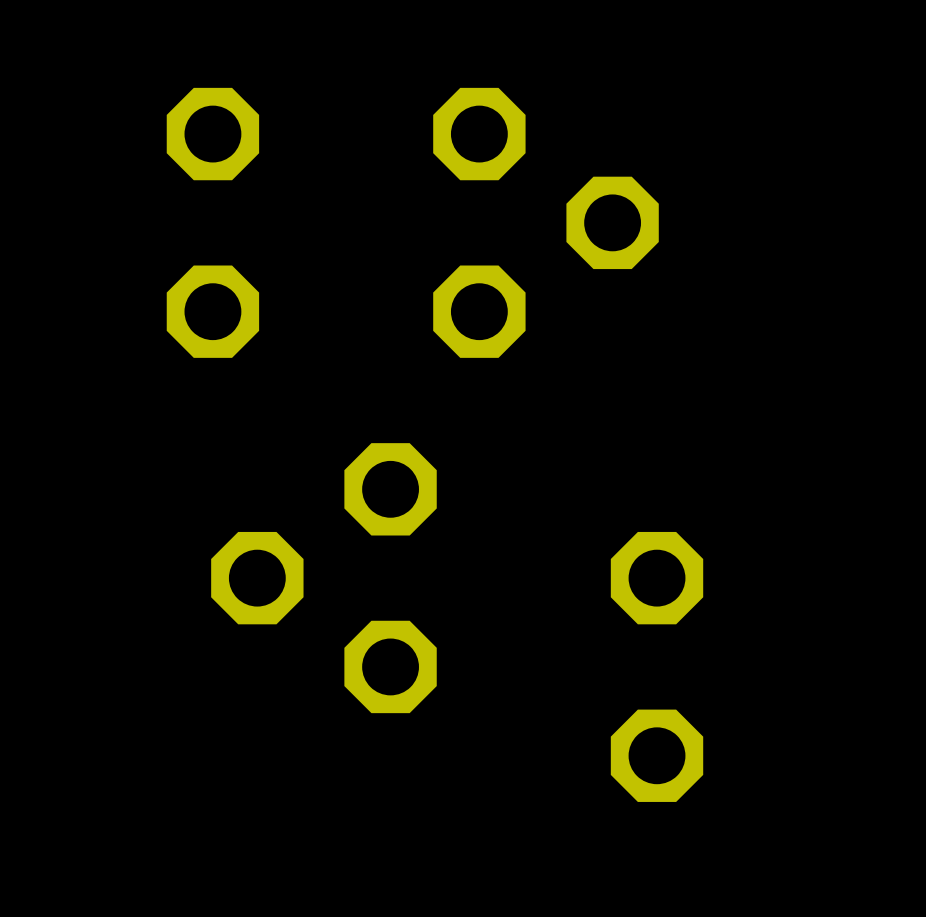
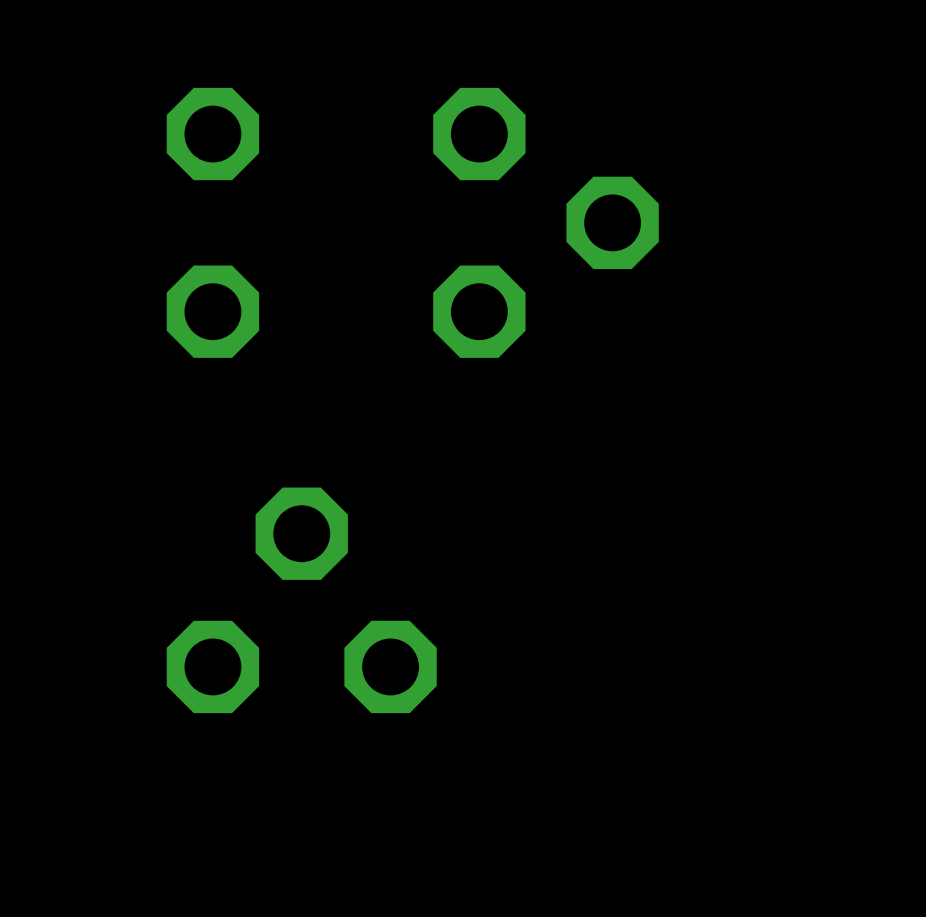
part rotation: 0° (323, 578) -> 90° clockwise (301, 600)
part: (657, 666) -> none

